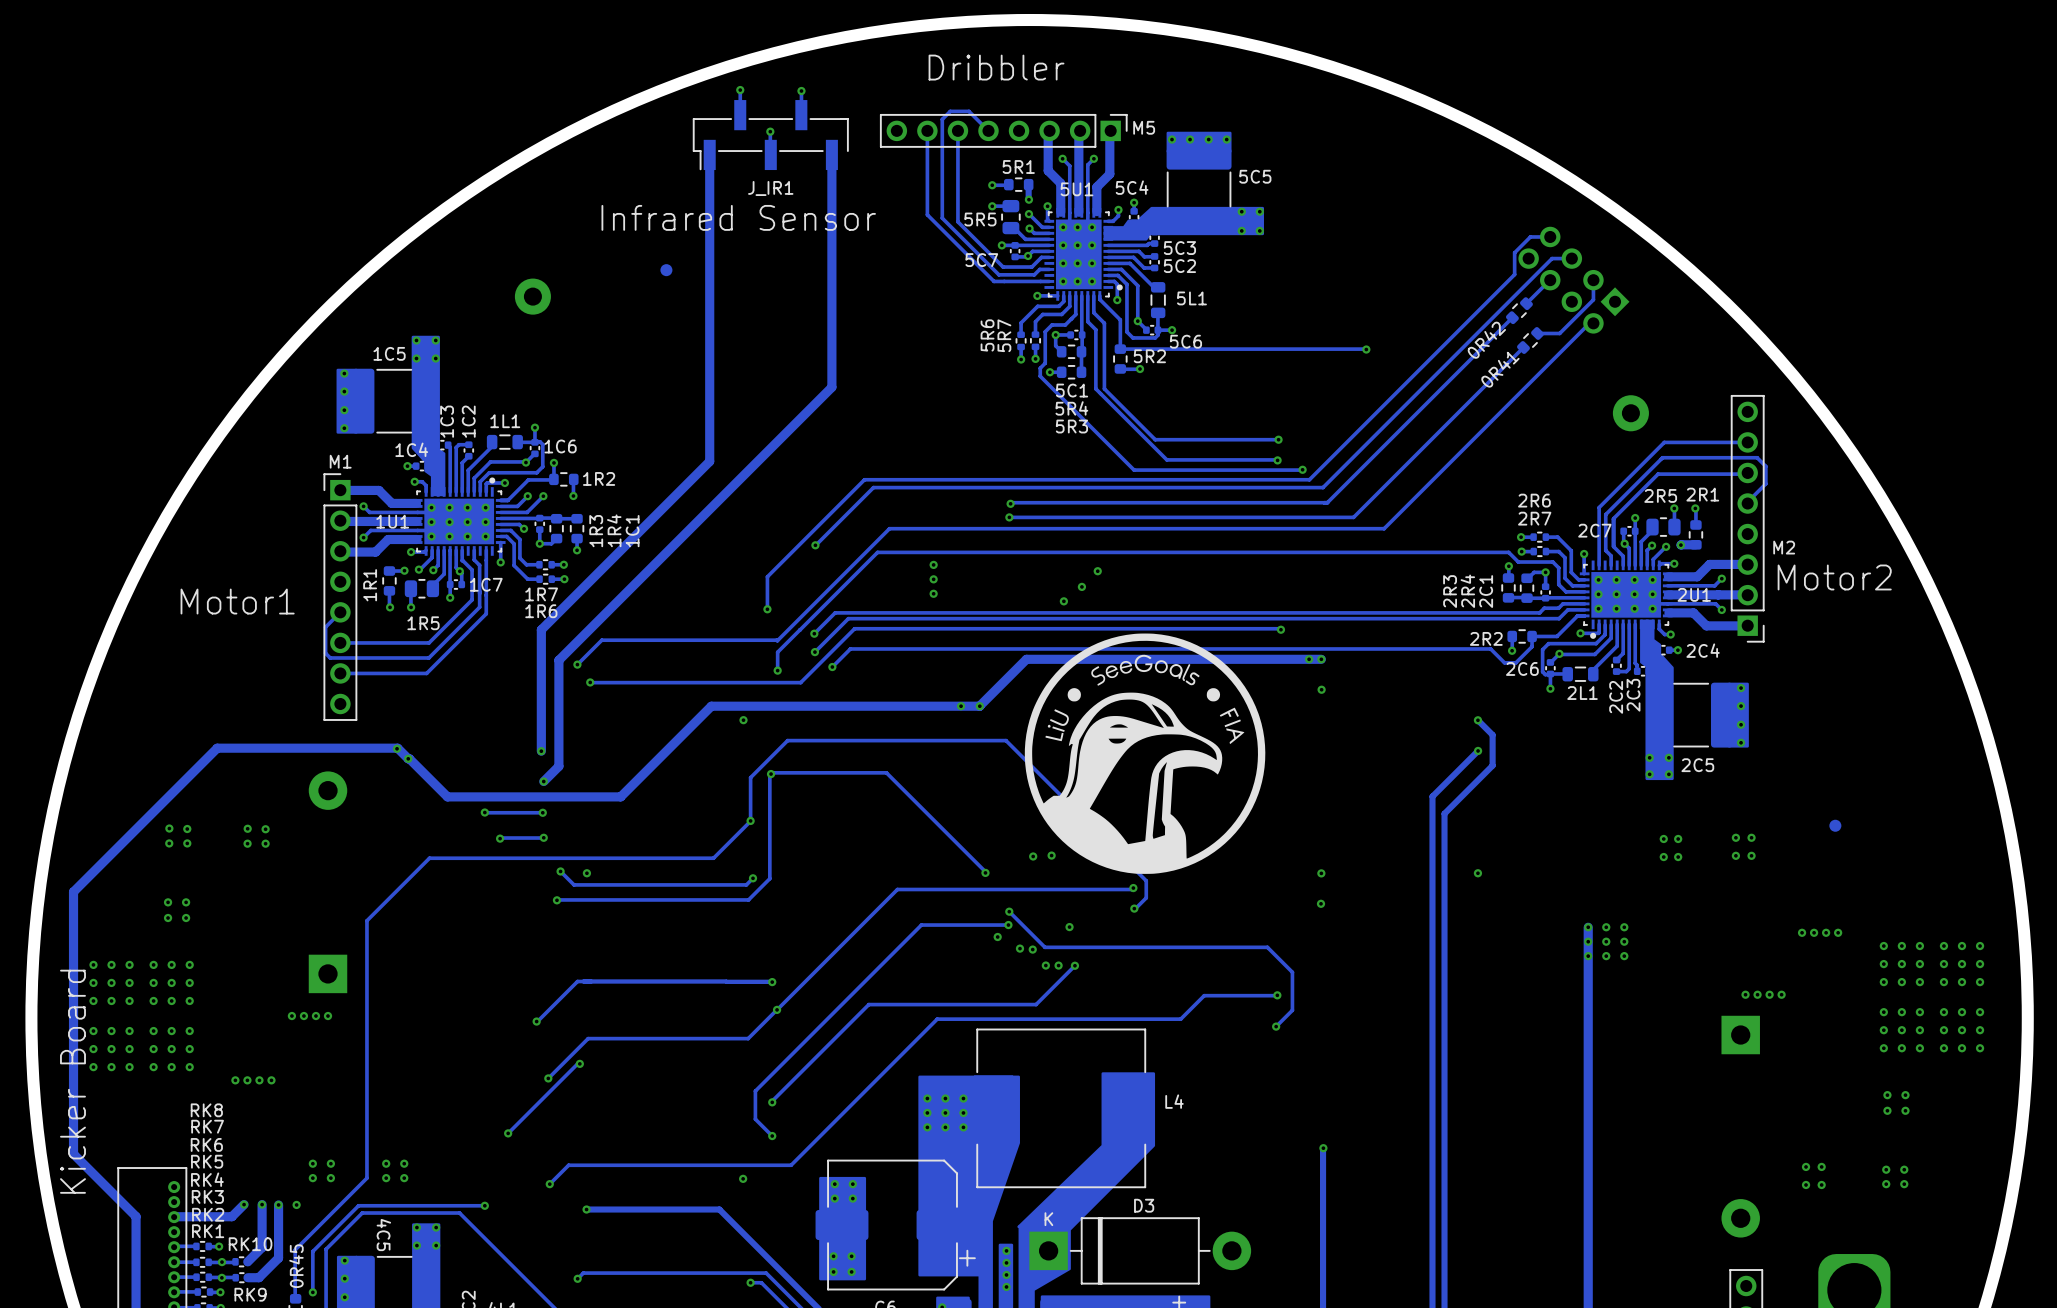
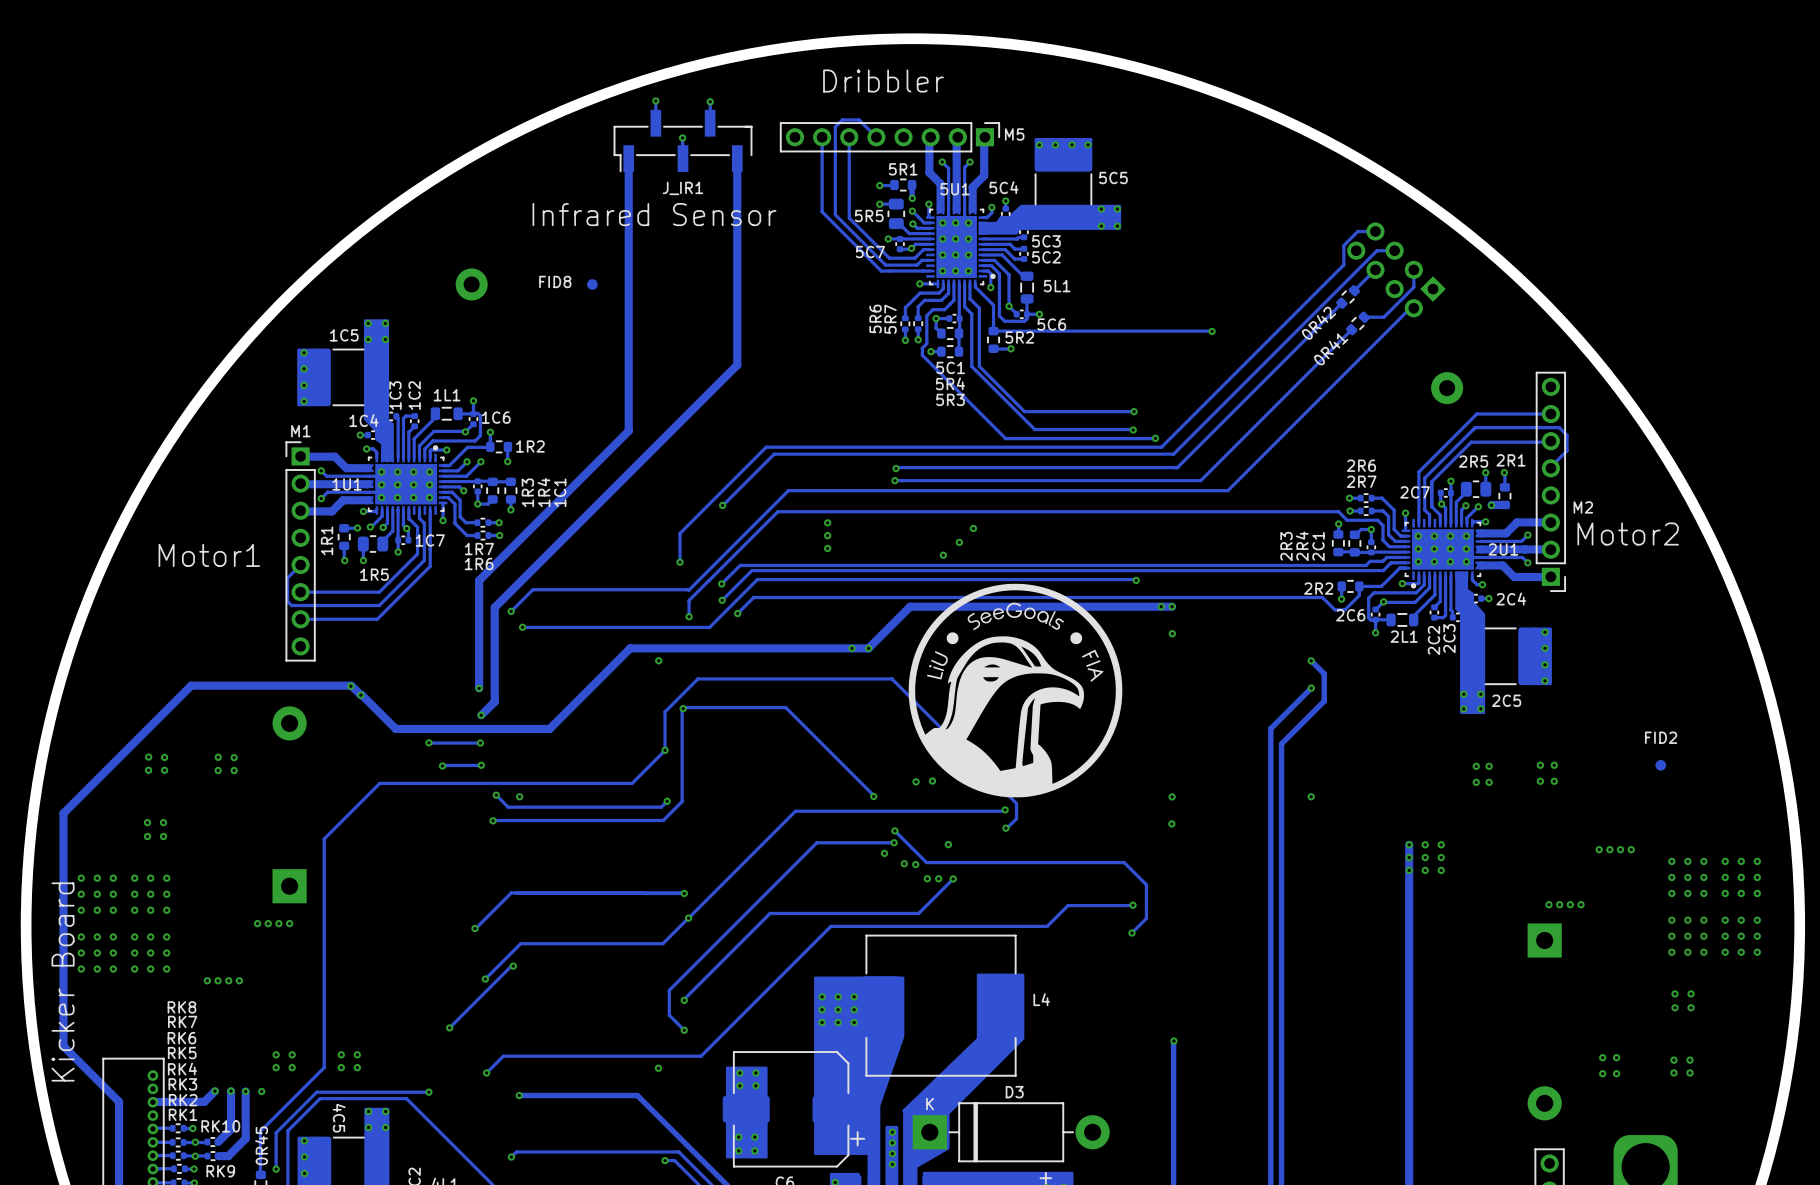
part: (666, 270) -> none
FID8: none -> (592, 284)
part: (1835, 825) -> none
FID2: none -> (1660, 765)

